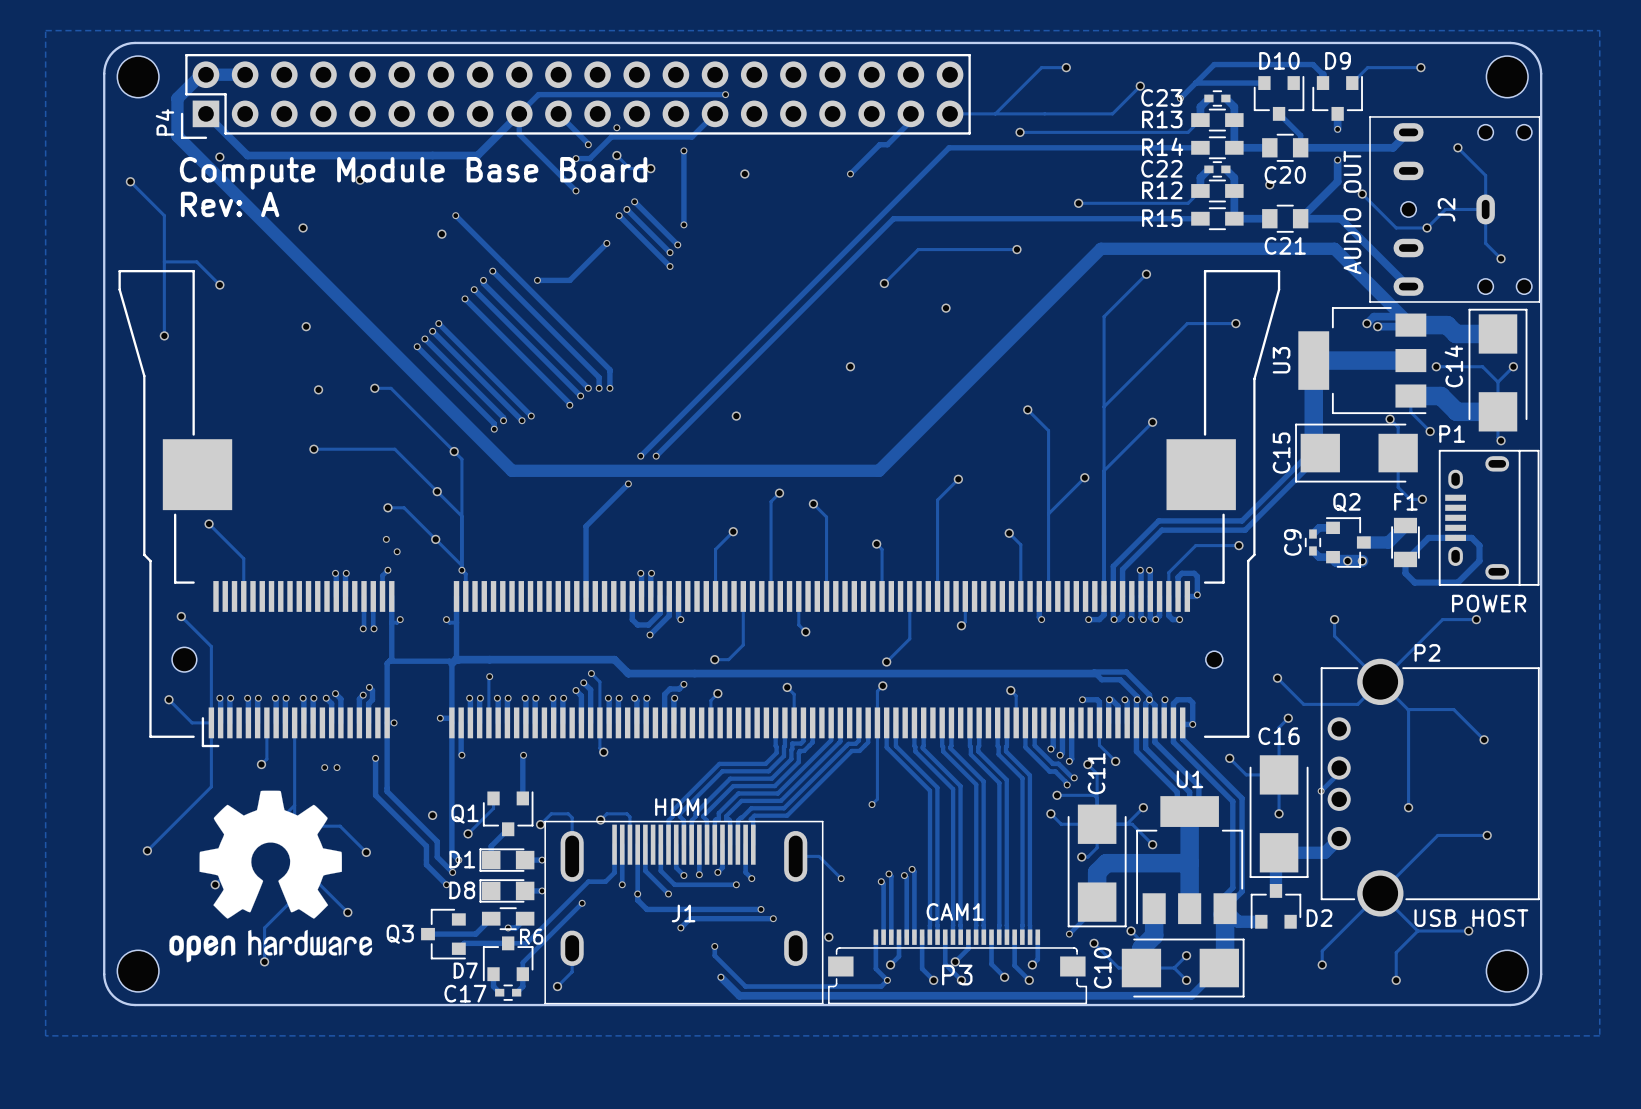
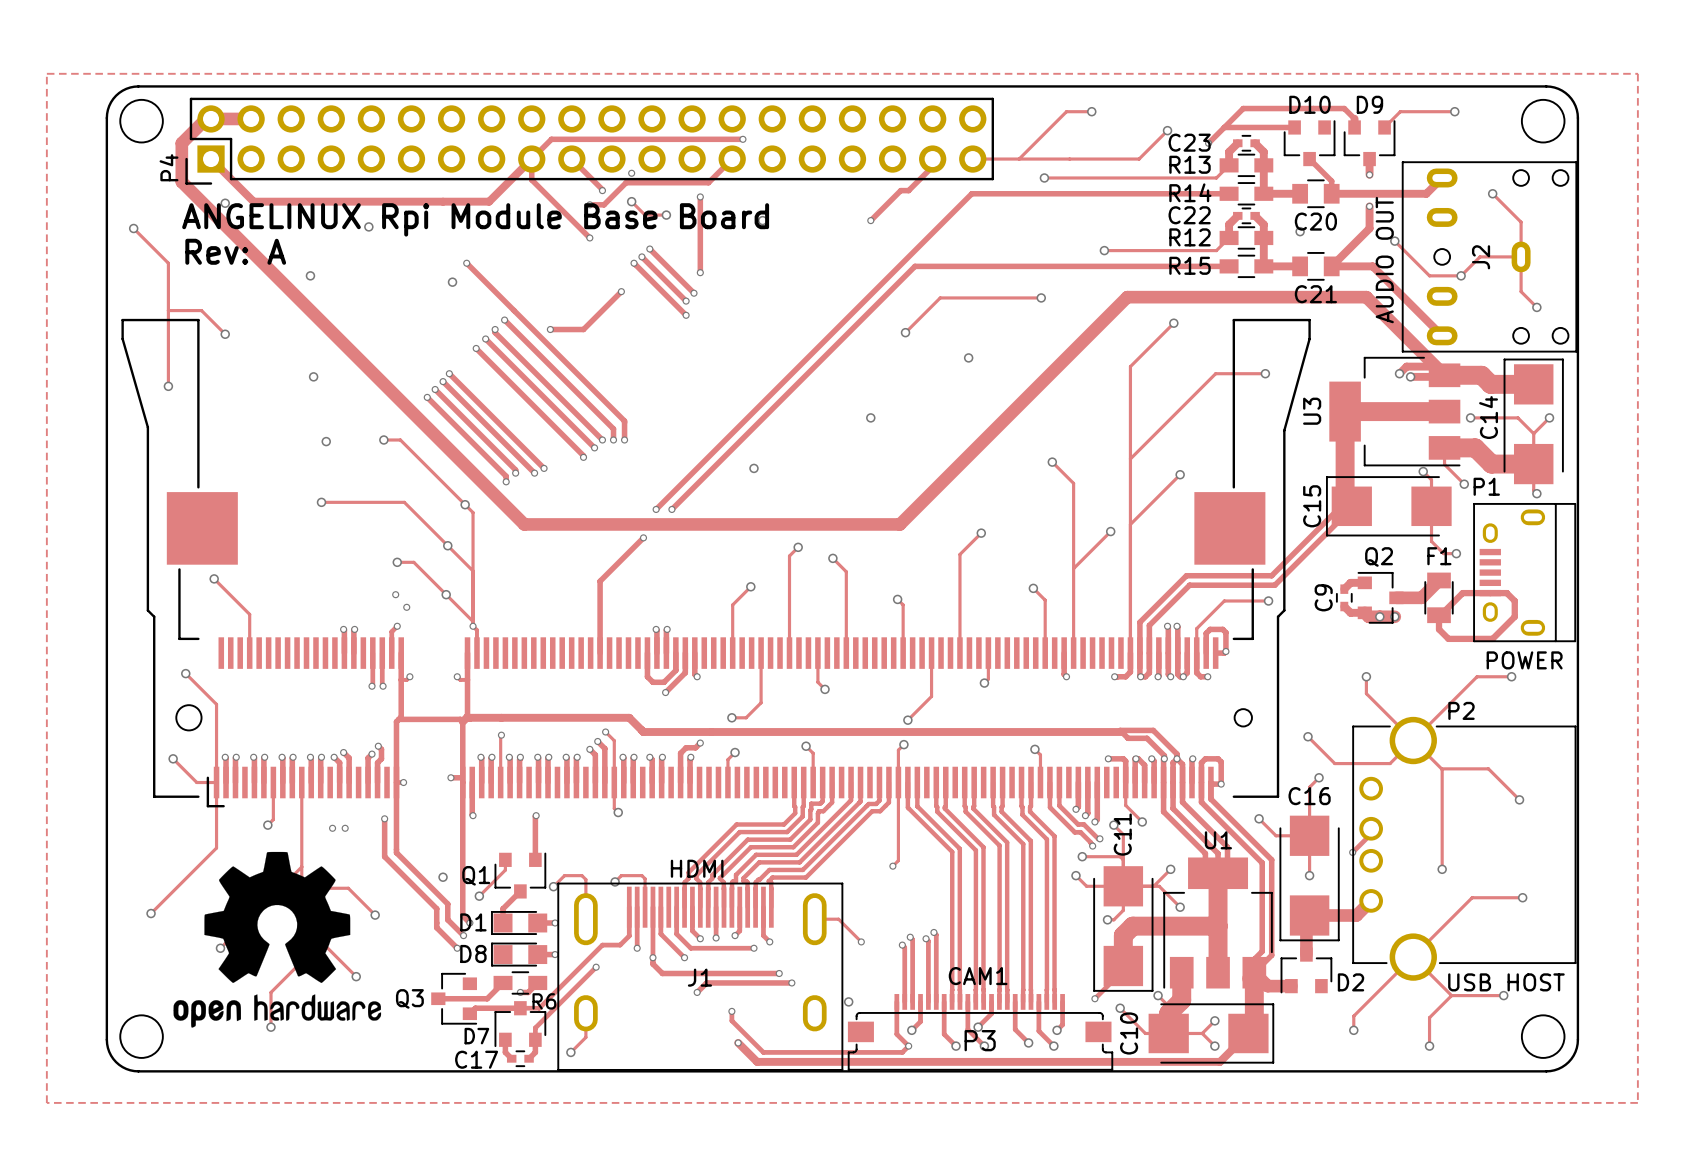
text: Compute Module Base Board (413, 173) -> ANGELINUX Rpi Module Base Board (475, 219)

